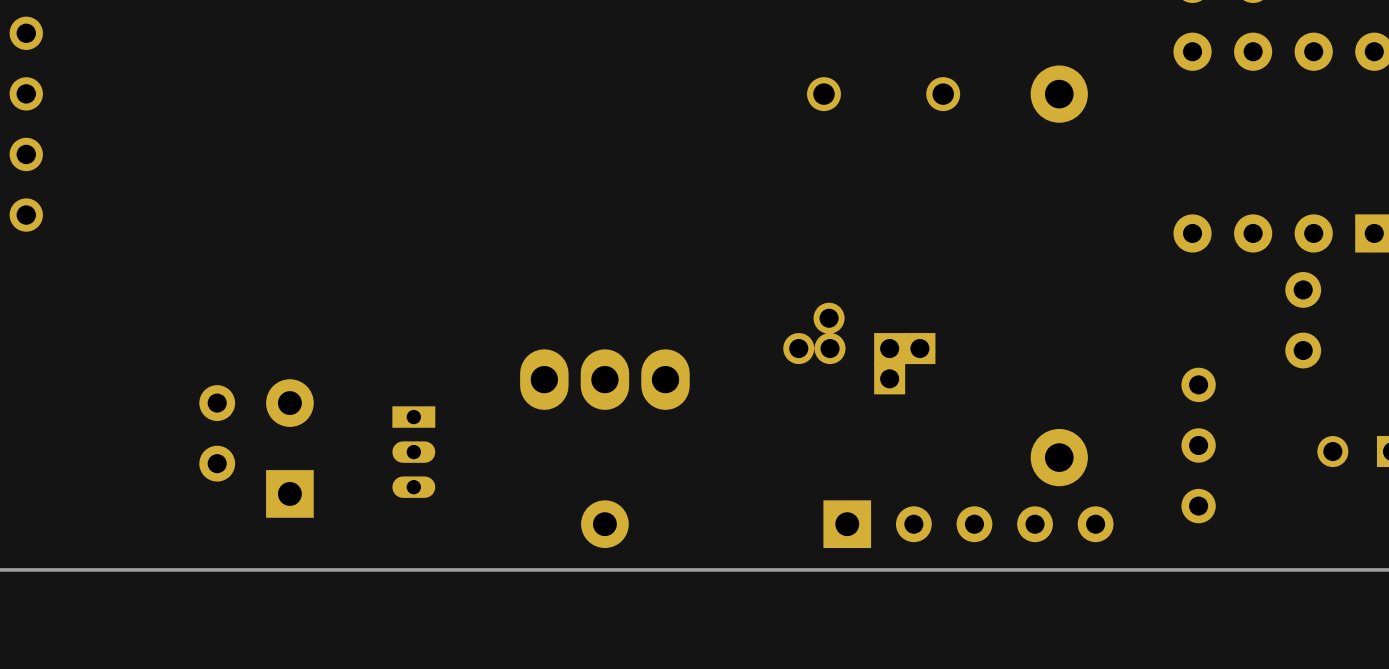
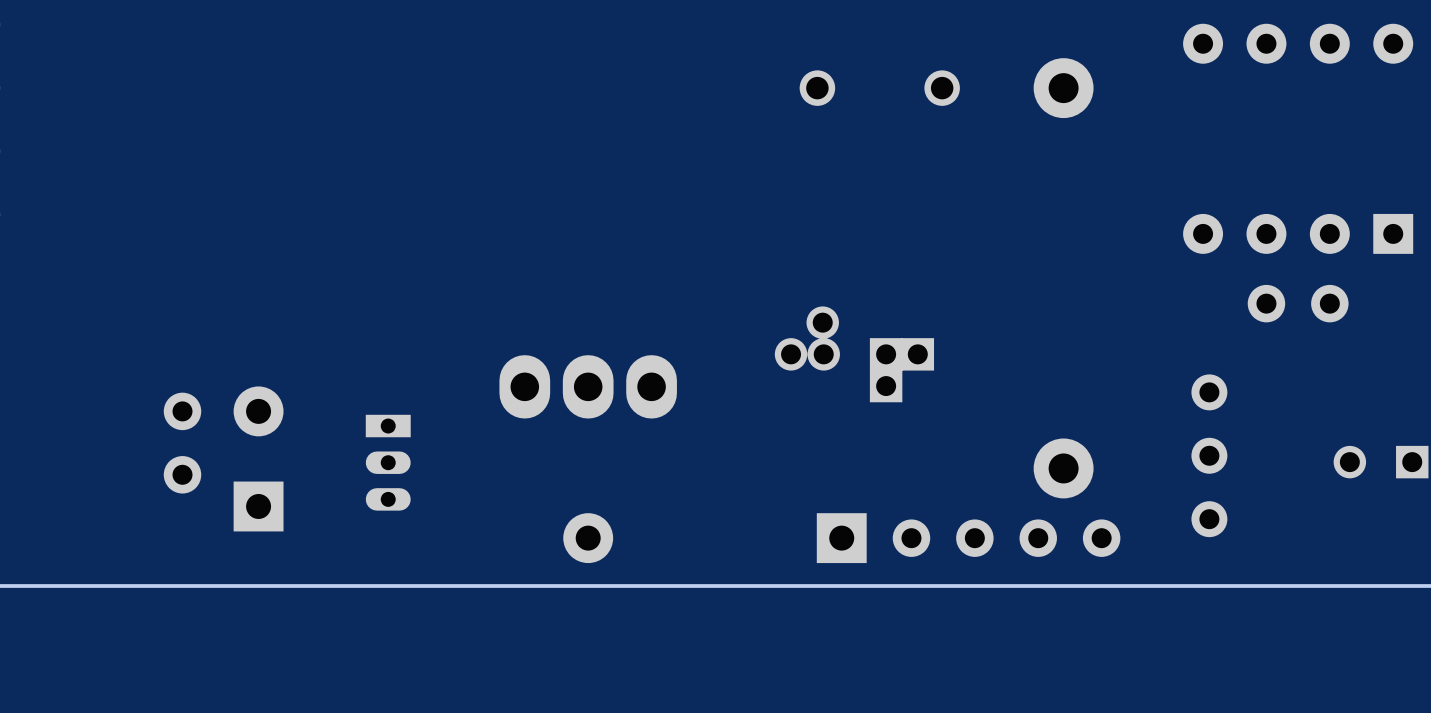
part rotation: 0° (1303, 320) -> 90° clockwise (1298, 303)

